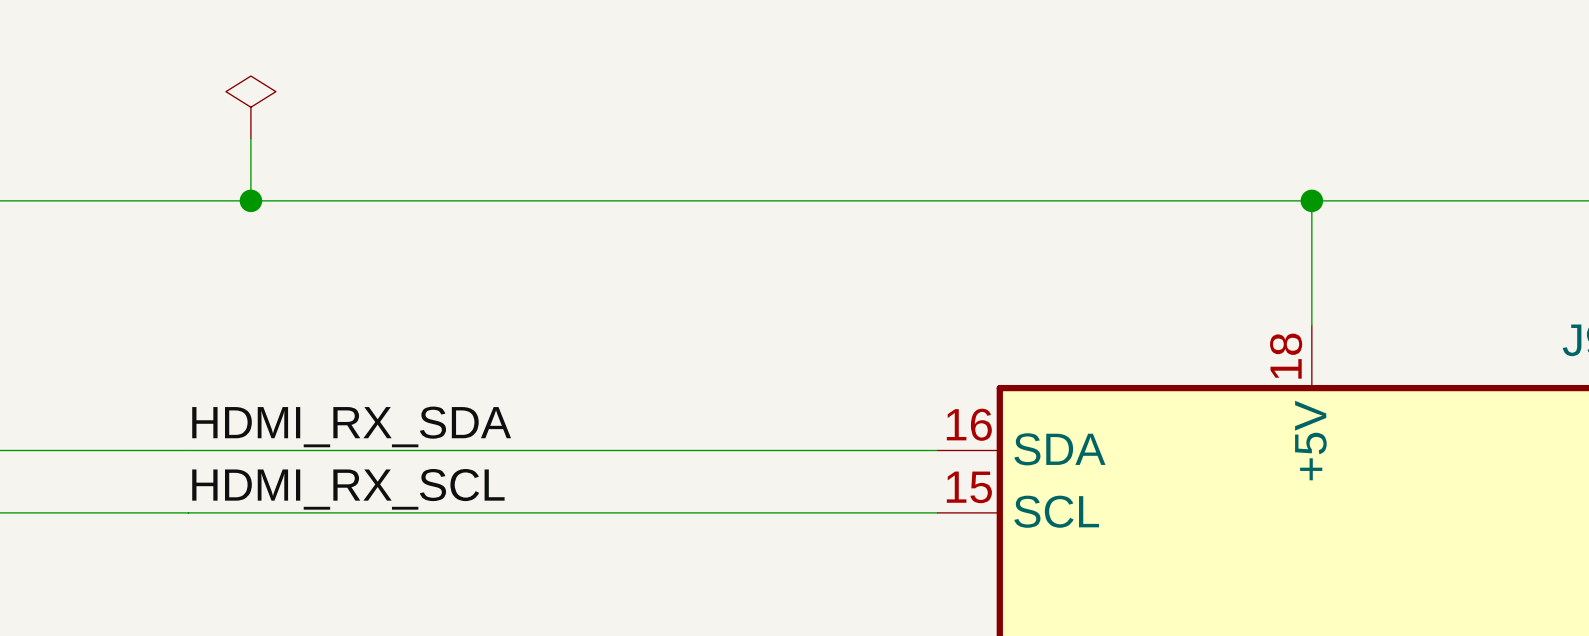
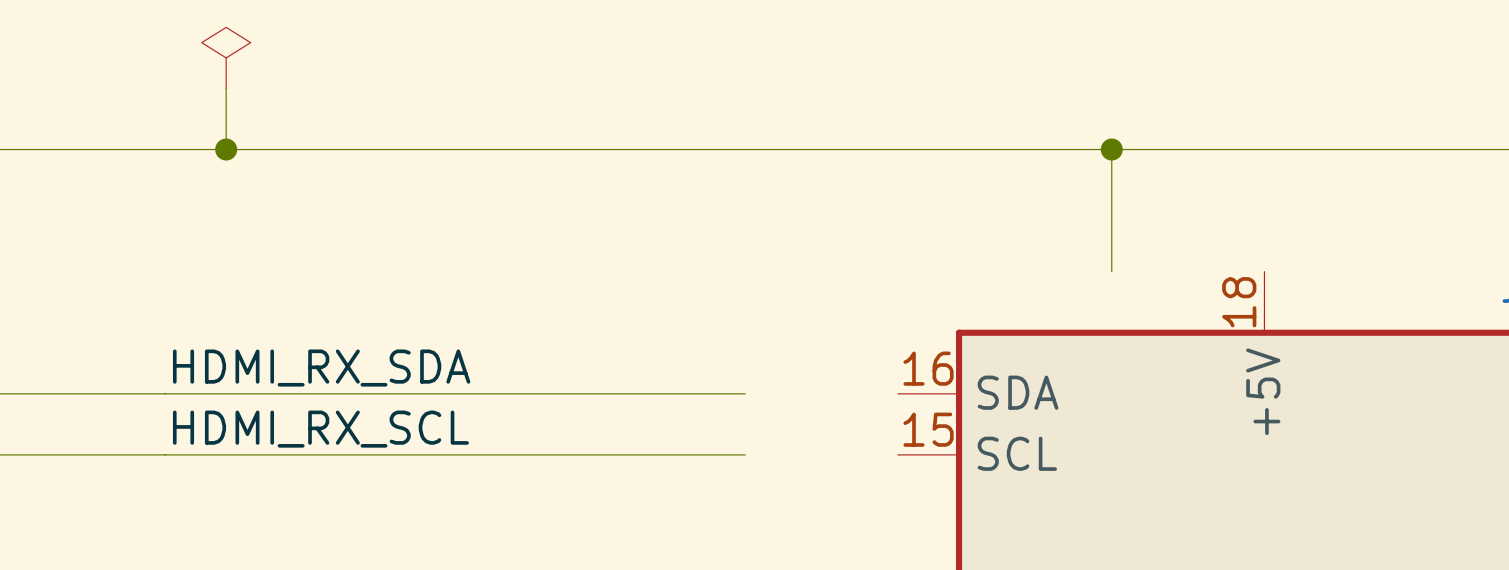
junction: none -> (1111, 149)
wire: (1311, 200) (1311, 325) -> (1111, 149) (1111, 271)
junction: (1311, 200) -> none
wire: (781, 450) (937, 450) -> none
wire: (781, 512) (937, 512) -> none

